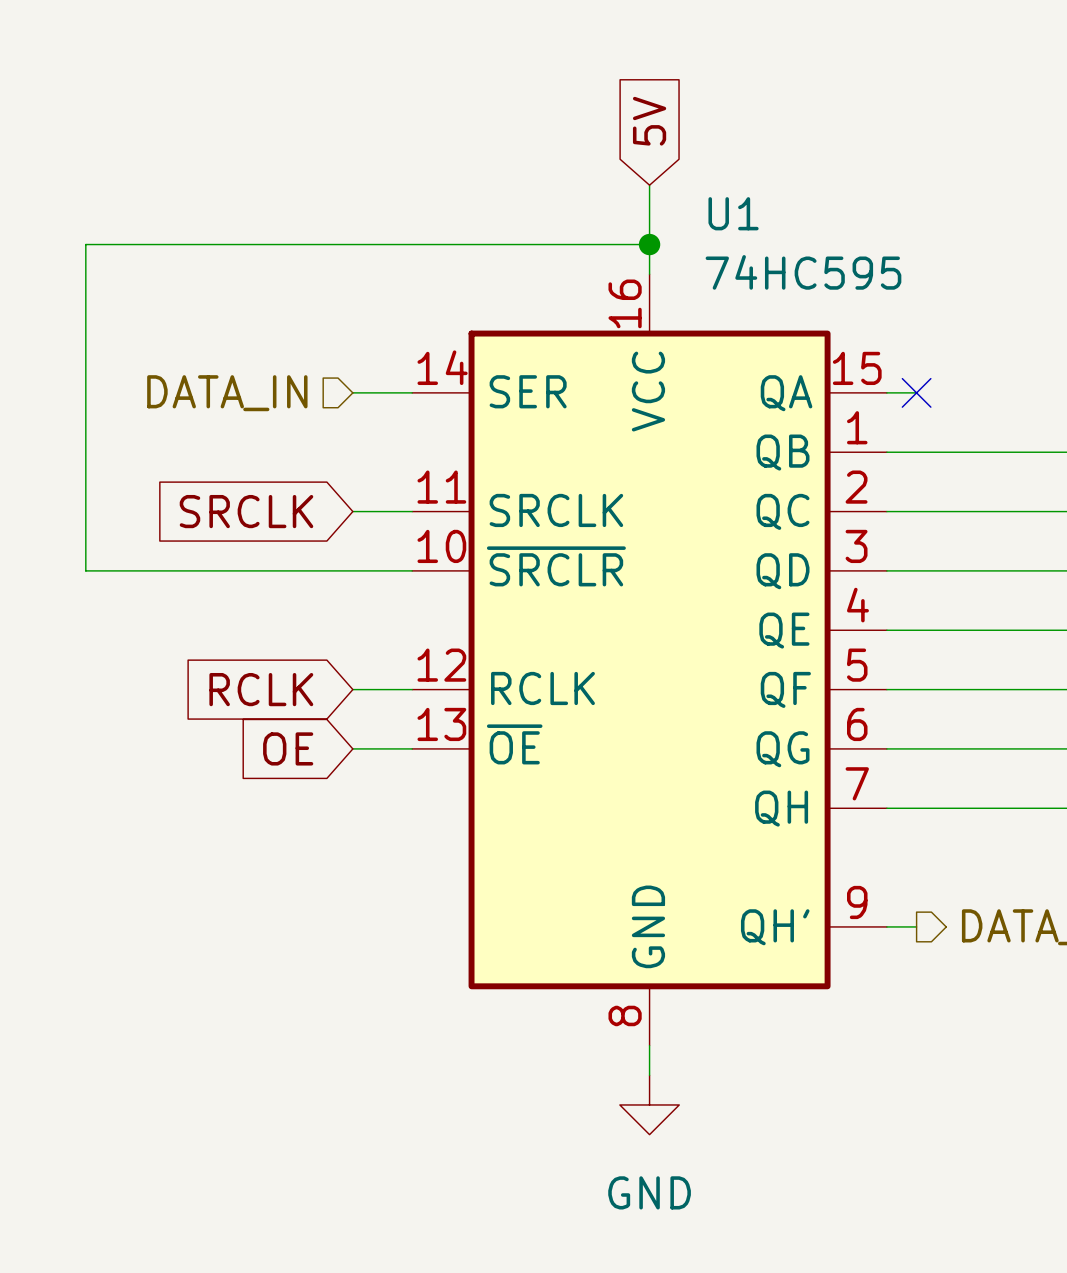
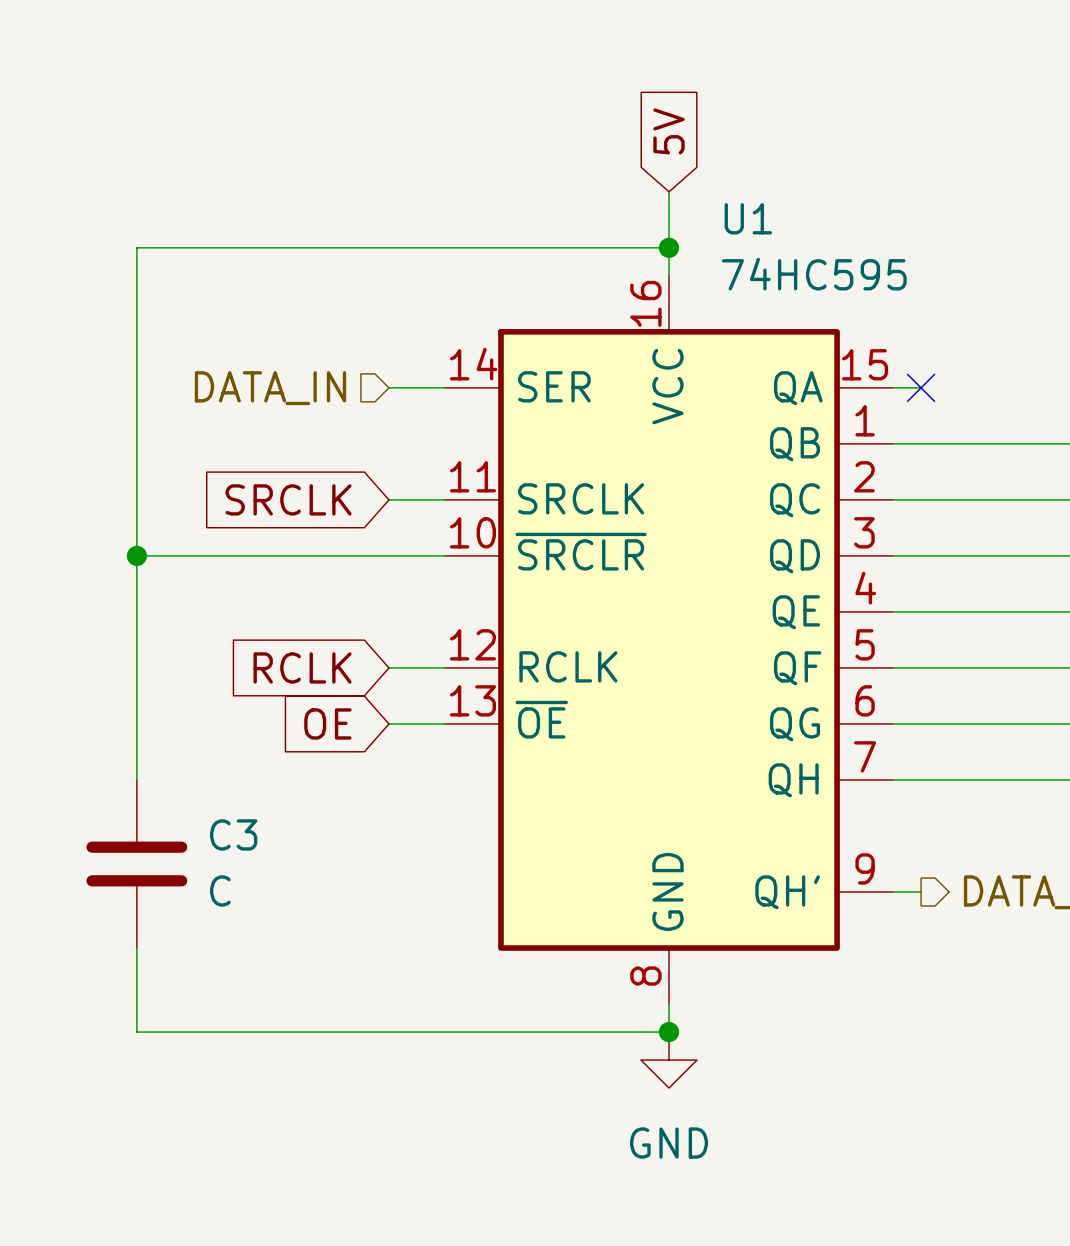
wire: none -> (136, 555) (136, 779)
junction: none -> (136, 555)
C3: none -> C (136, 864)
wire: none -> (136, 948) (136, 1032) (669, 1032)
junction: none -> (669, 1032)

